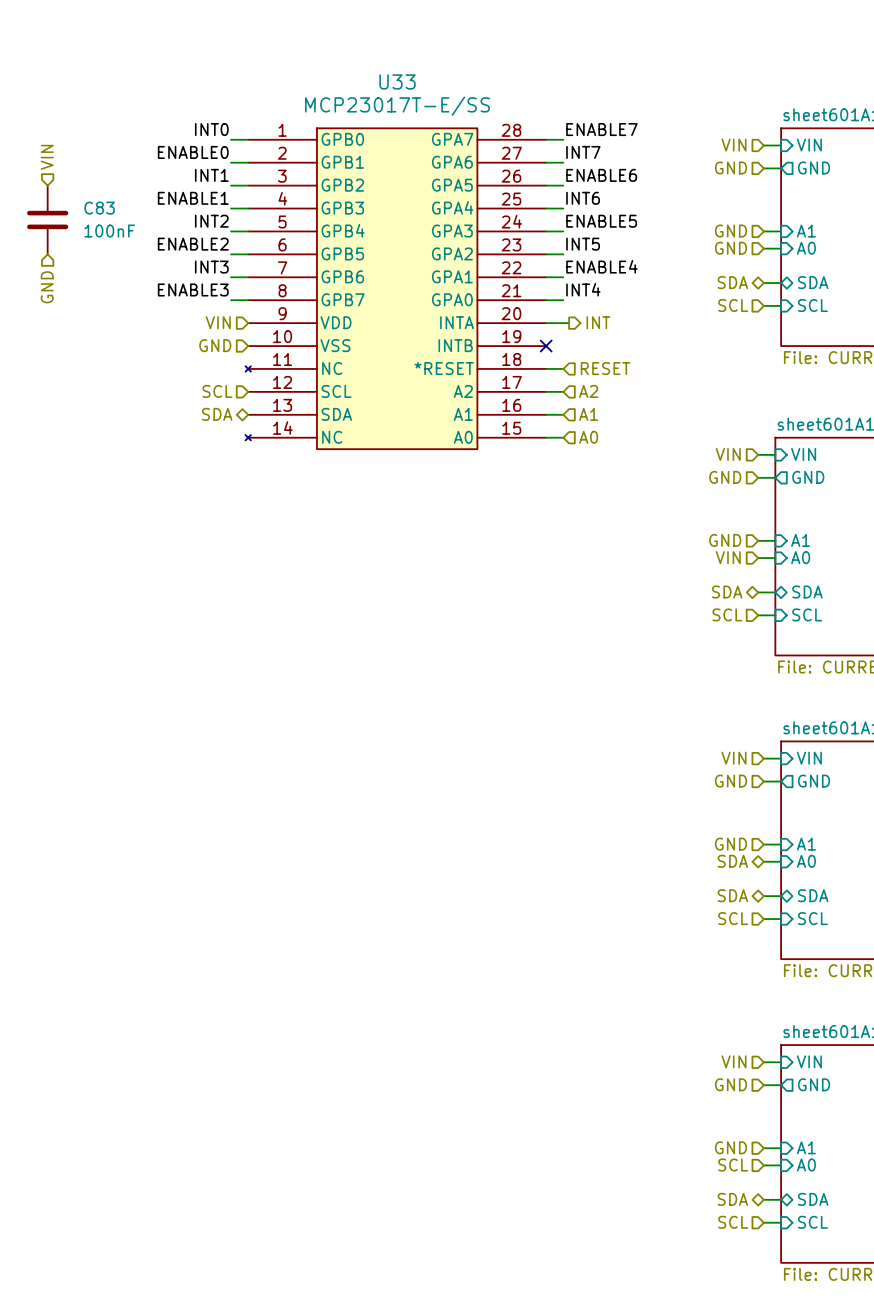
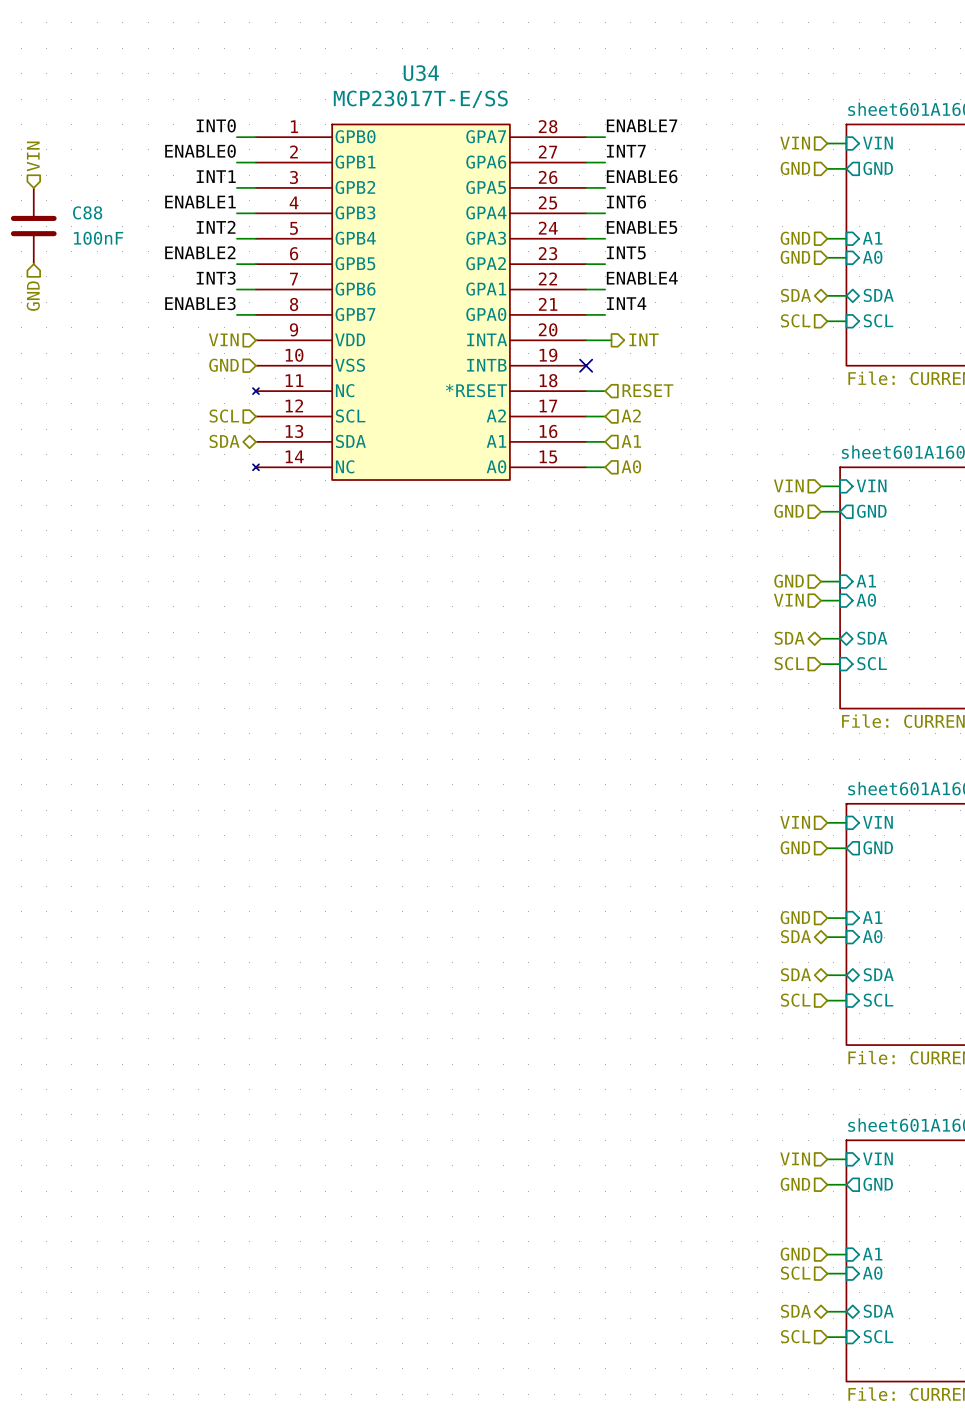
U33 name: U33 (397, 81) -> U34 (421, 73)
C83 name: C83 (99, 208) -> C88 (87, 212)

